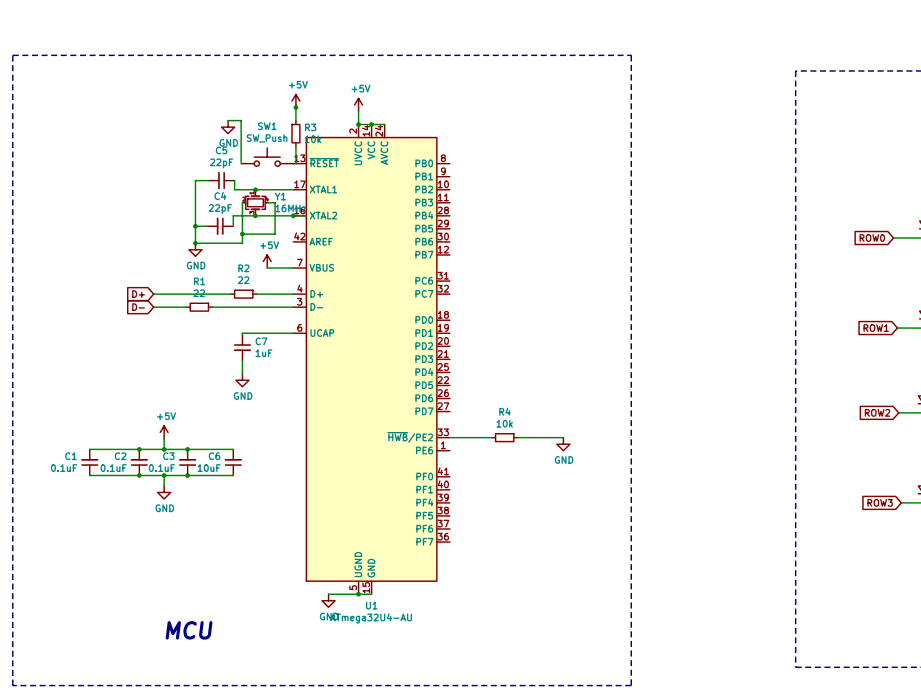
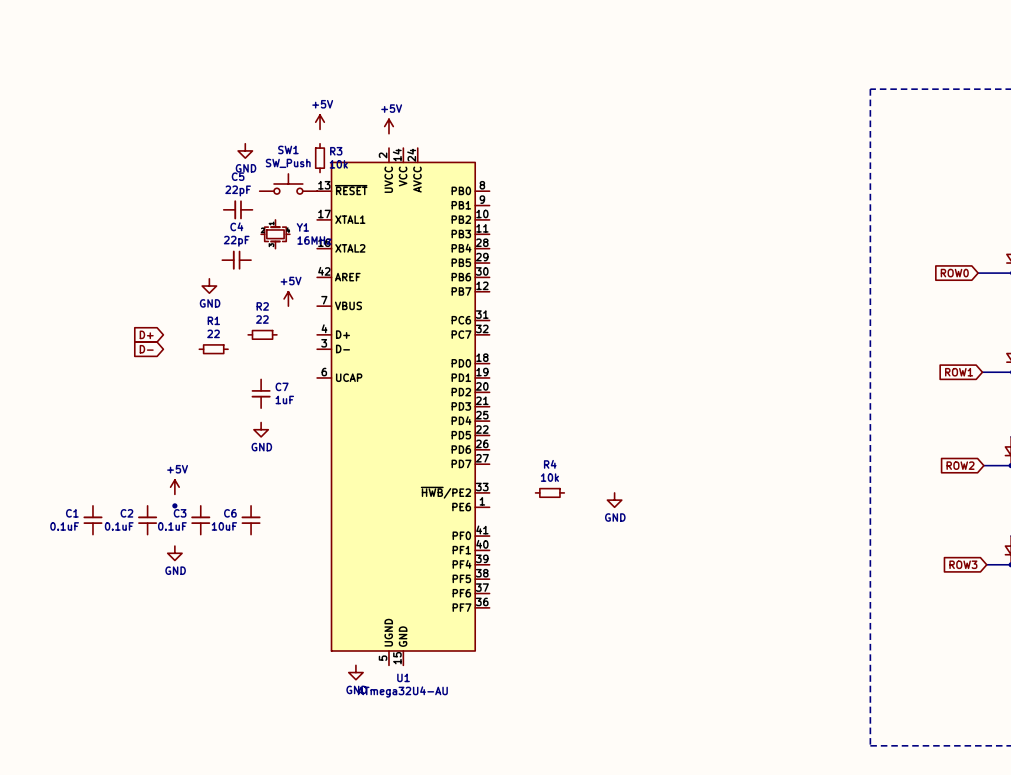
line: (12, 55) (12, 685) (631, 685) (631, 55) (12, 55) -> none
wire: (295, 106) (295, 120) -> none
junction: (295, 107) -> none
wire: (358, 111) (358, 124) (384, 124) -> none
wire: (228, 120) (241, 120) (241, 162) -> none
junction: (358, 124) -> none
junction: (371, 124) -> none
wire: (295, 146) (295, 163) -> none
wire: (208, 180) (195, 180) (195, 243) (242, 243) (242, 202) -> none
wire: (234, 180) (234, 189) (293, 189) -> none
junction: (255, 189) -> none
wire: (268, 202) (275, 202) (275, 234) (242, 234) -> none
junction: (255, 215) -> none
junction: (293, 215) -> none
wire: (306, 215) (233, 215) (233, 226) -> none
wire: (195, 226) (207, 226) -> none
junction: (195, 226) -> none
junction: (242, 234) -> none
junction: (195, 243) -> none
wire: (267, 268) (293, 268) -> none
wire: (153, 294) (230, 294) -> none
wire: (256, 294) (293, 294) -> none
wire: (153, 307) (186, 307) -> none
wire: (212, 307) (293, 307) -> none
wire: (293, 333) (242, 334) -> none
wire: (242, 360) (242, 373) -> none
wire: (449, 437) (491, 437) -> none
wire: (517, 437) (563, 437) -> none
wire: (164, 438) (164, 449) -> none
wire: (89, 449) (233, 449) -> none
junction: (139, 449) -> none
junction: (187, 449) -> none
wire: (89, 475) (233, 475) -> none
junction: (139, 475) -> none
wire: (164, 475) (164, 485) -> none
junction: (164, 475) -> none
junction: (187, 475) -> none
wire: (328, 594) (371, 594) -> none
junction: (358, 594) -> none
text: MCU (189, 630) -> none

